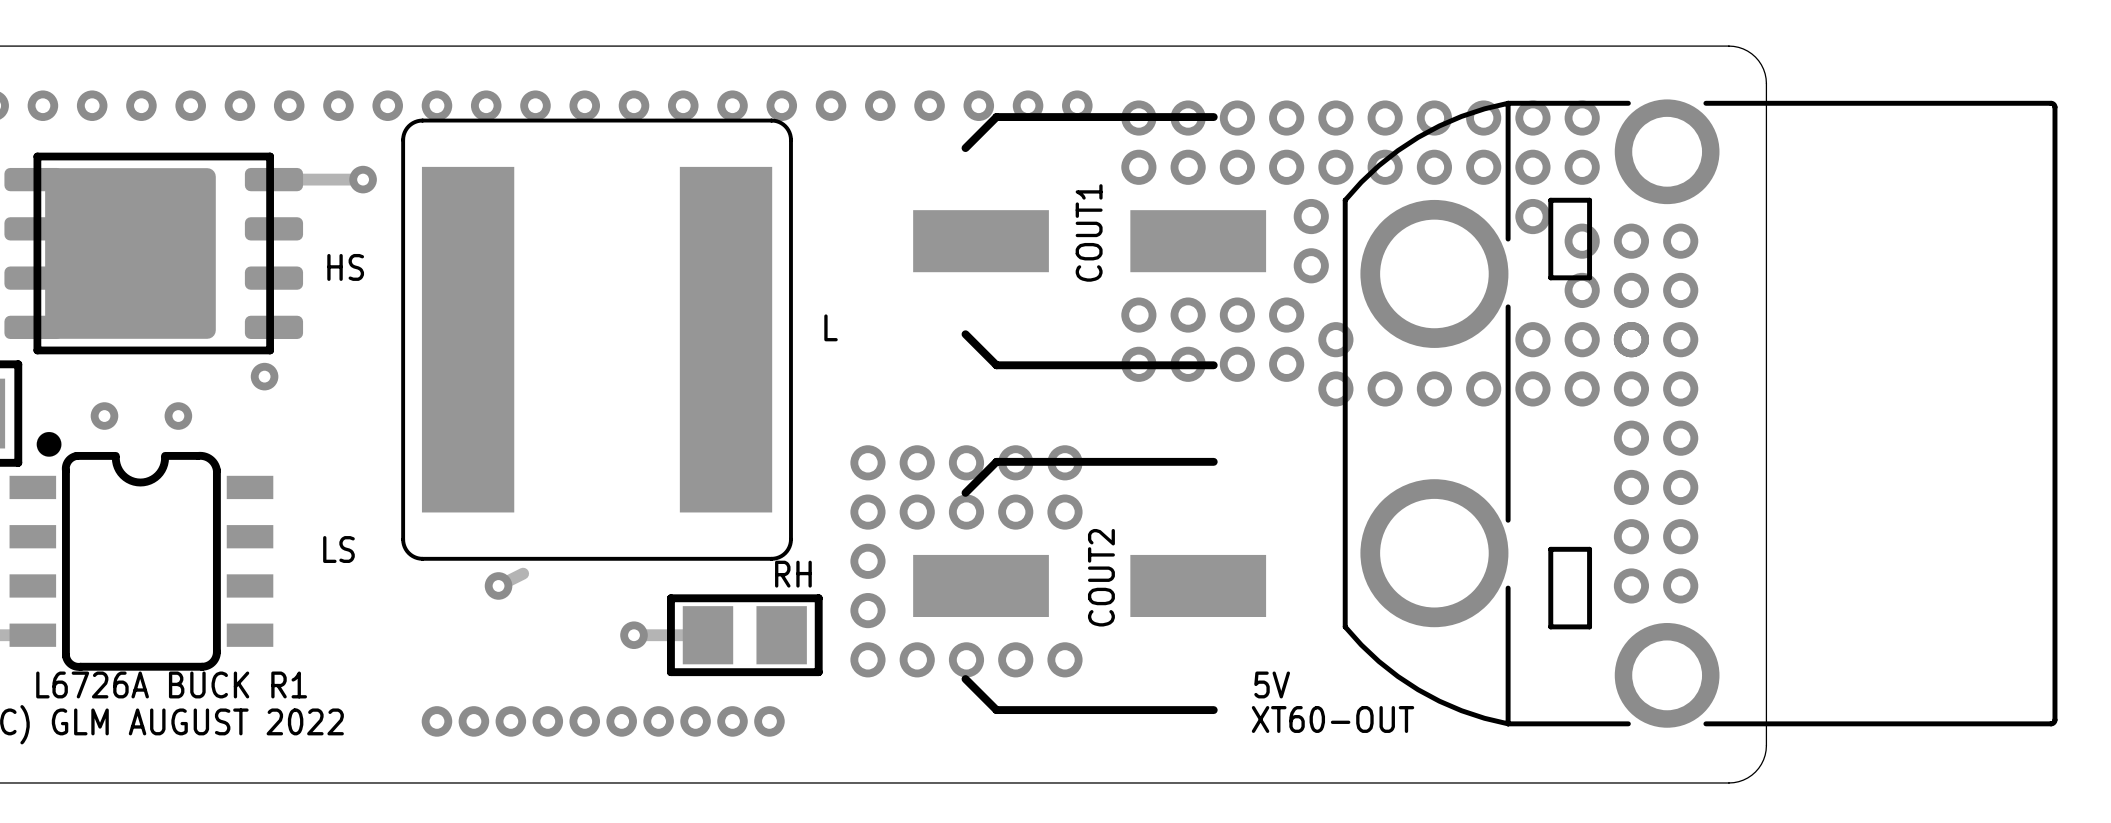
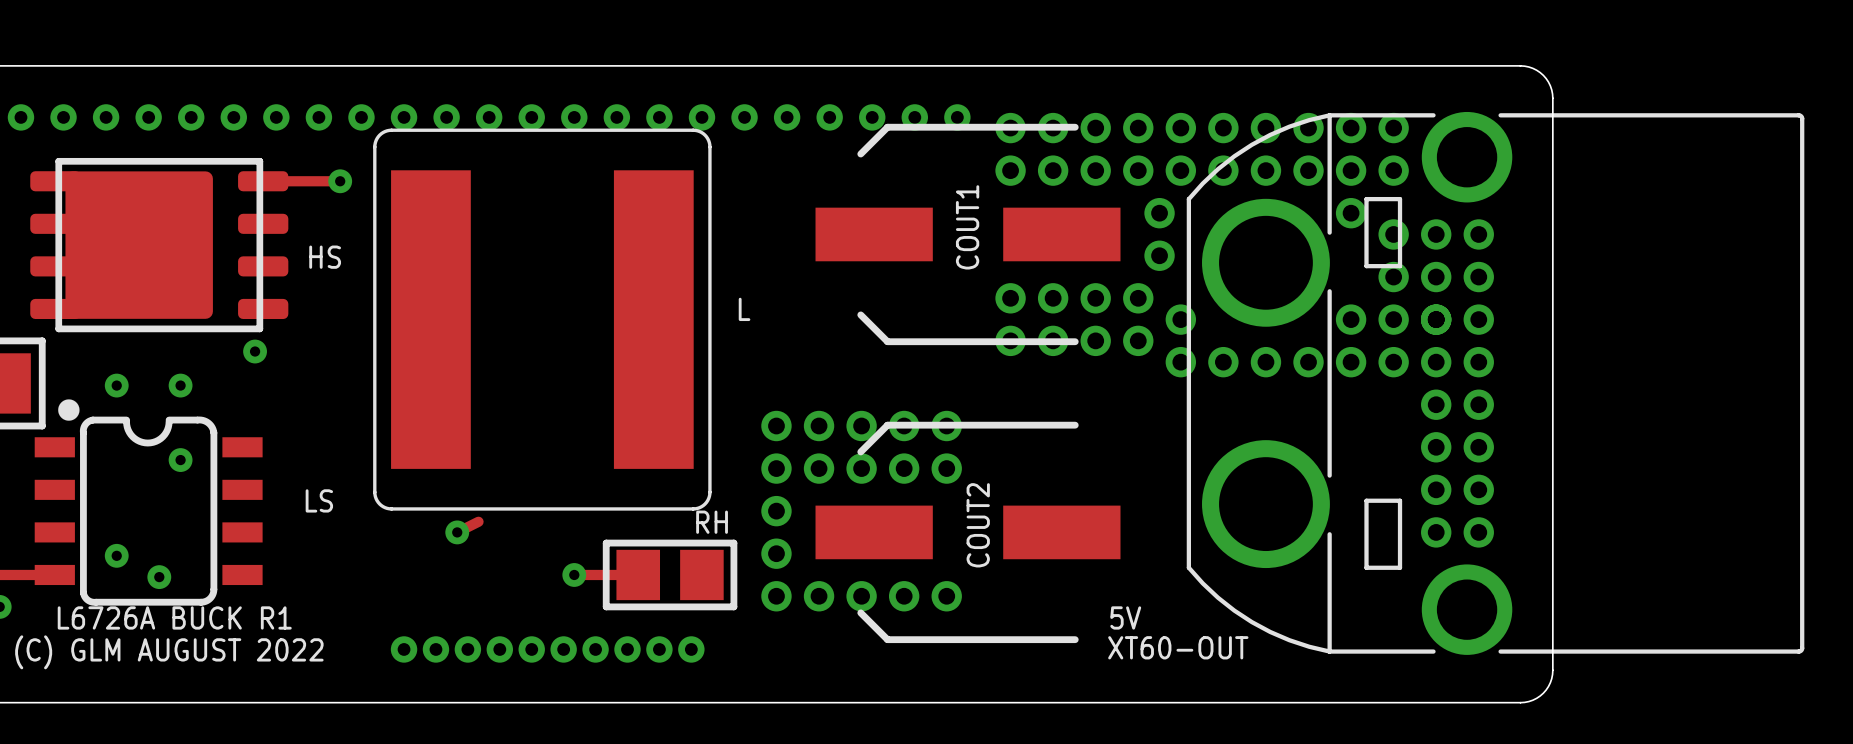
via: none -> (180, 460)
via: none -> (116, 555)
via: none -> (159, 577)

